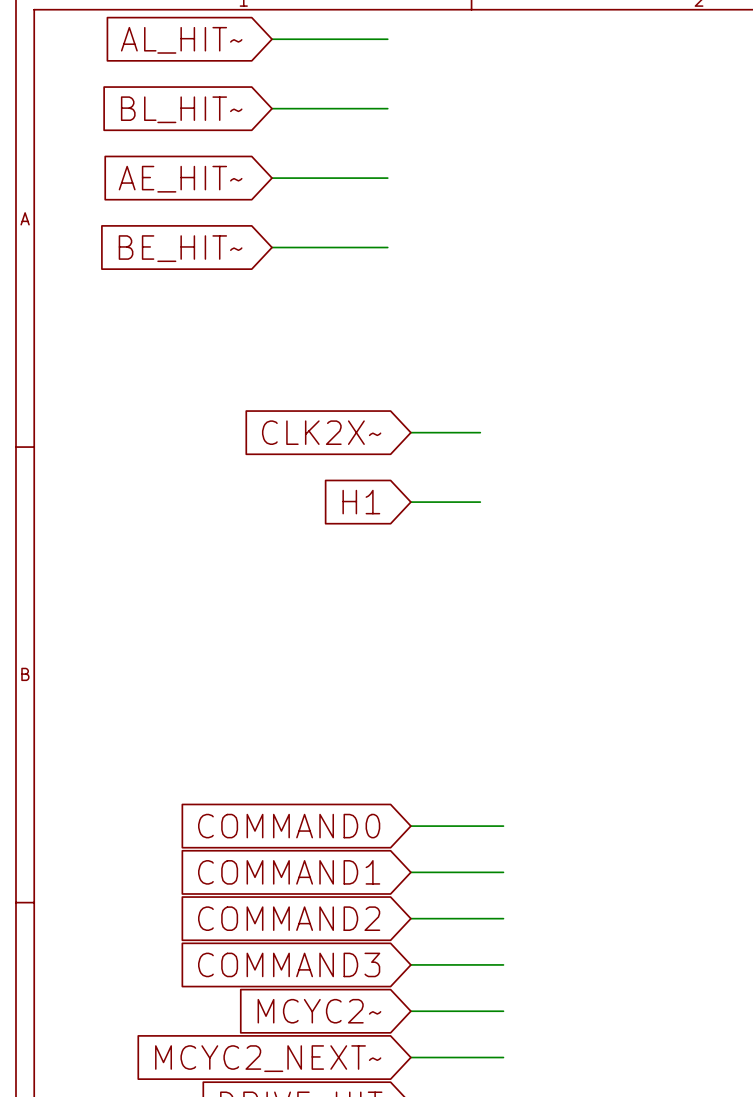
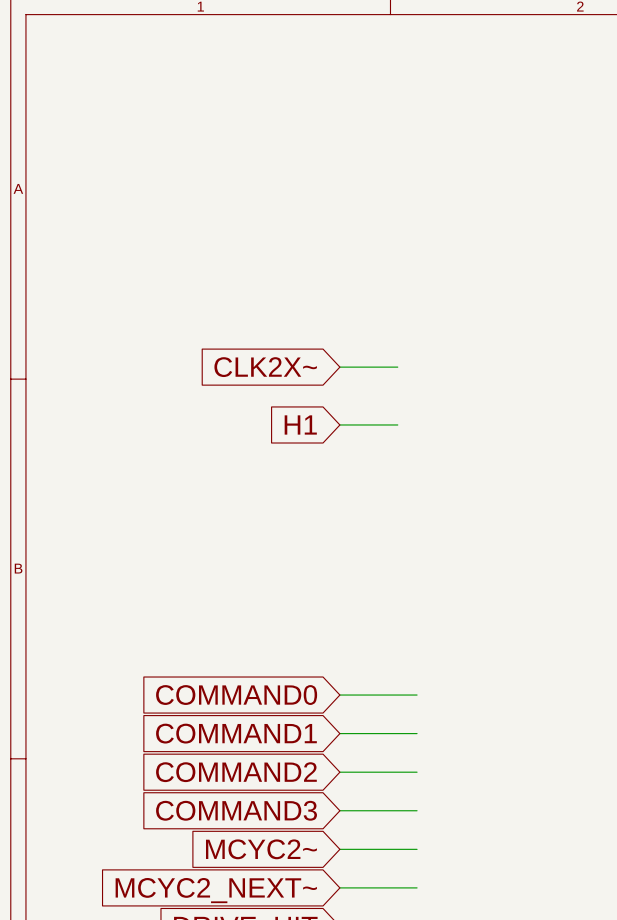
wire: (272, 39) (387, 39) -> none
global label: AL_HIT~ (181, 40) -> none
wire: (272, 108) (387, 108) -> none
global label: BL_HIT~ (181, 109) -> none
wire: (272, 178) (387, 178) -> none
global label: AE_HIT~ (180, 179) -> none
wire: (272, 247) (387, 247) -> none
global label: BE_HIT~ (180, 248) -> none

